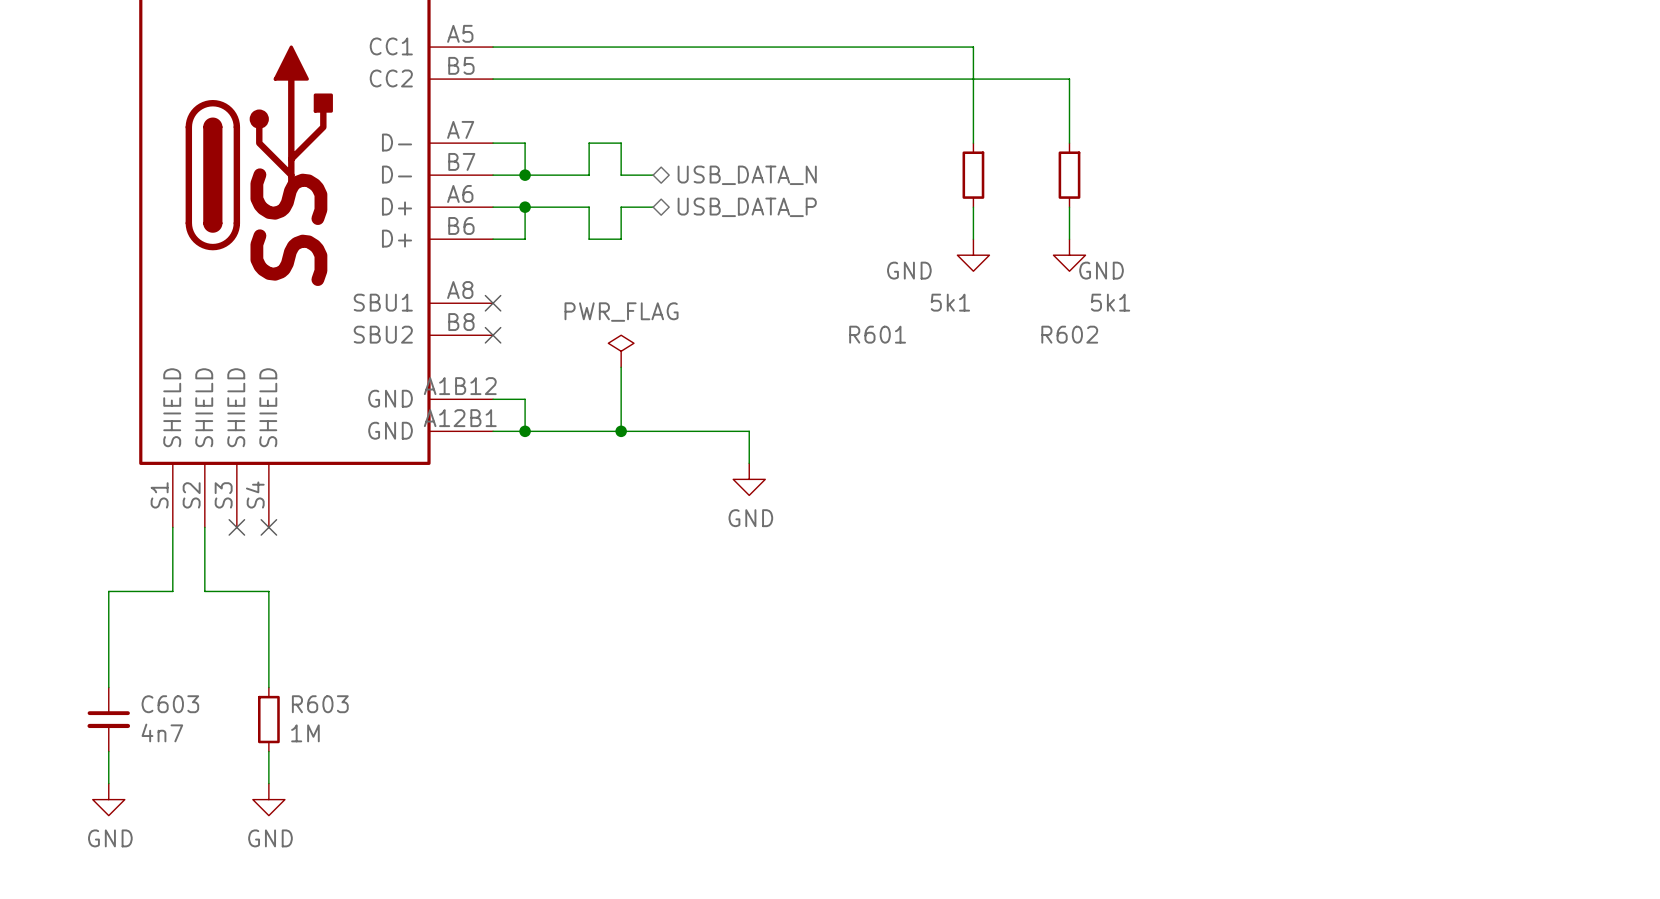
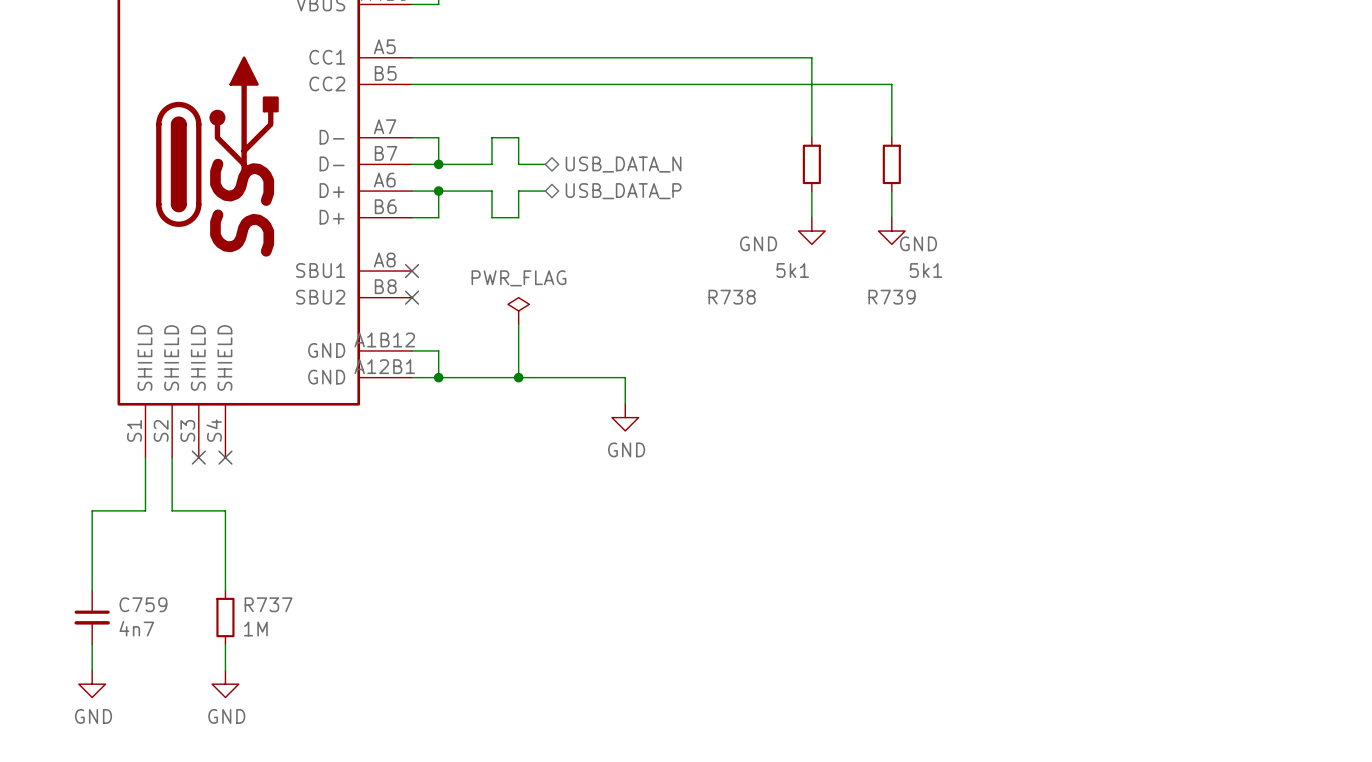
R601 name: R601 (877, 334) -> R738 (732, 297)
R602 name: R602 (1069, 334) -> R739 (892, 297)
C603 name: C603 (170, 704) -> C759 (143, 604)
R603 name: R603 (320, 704) -> R737 (268, 604)

